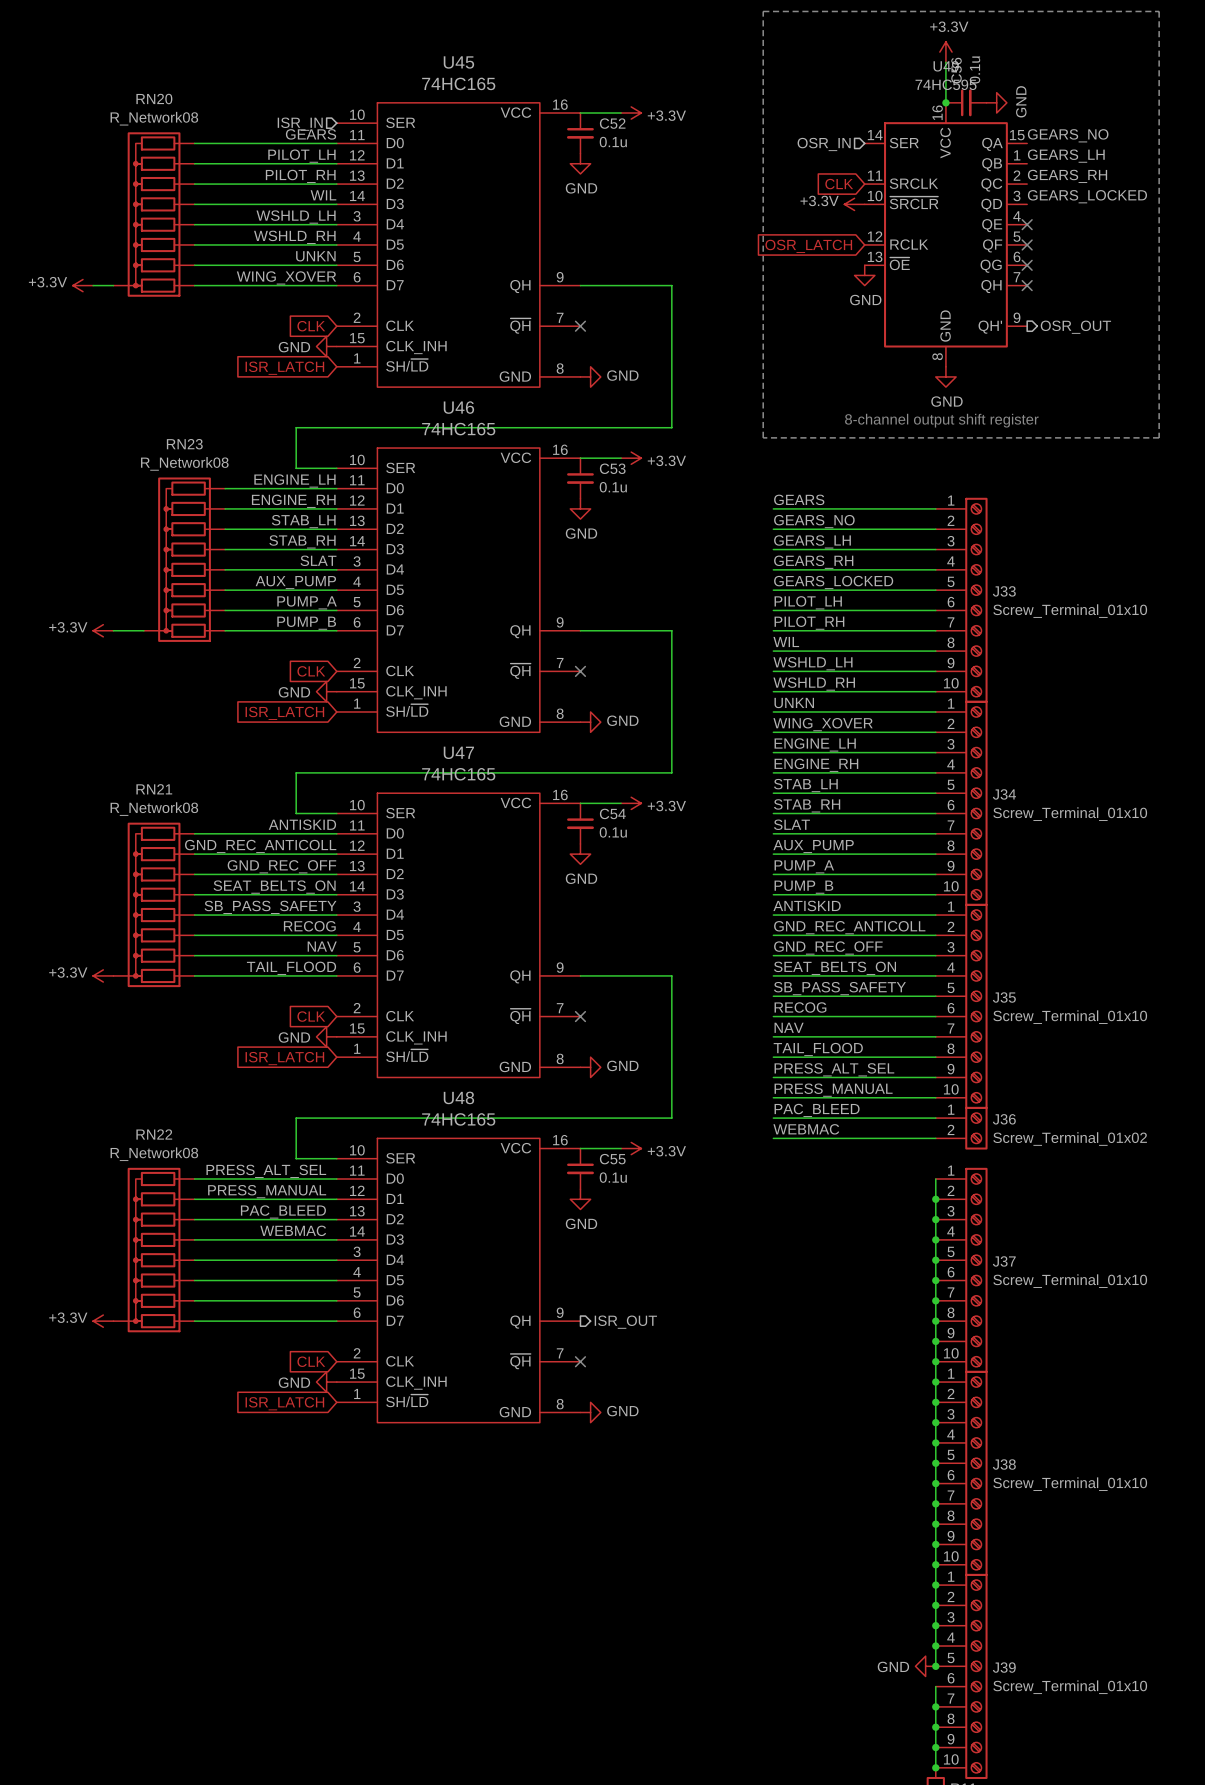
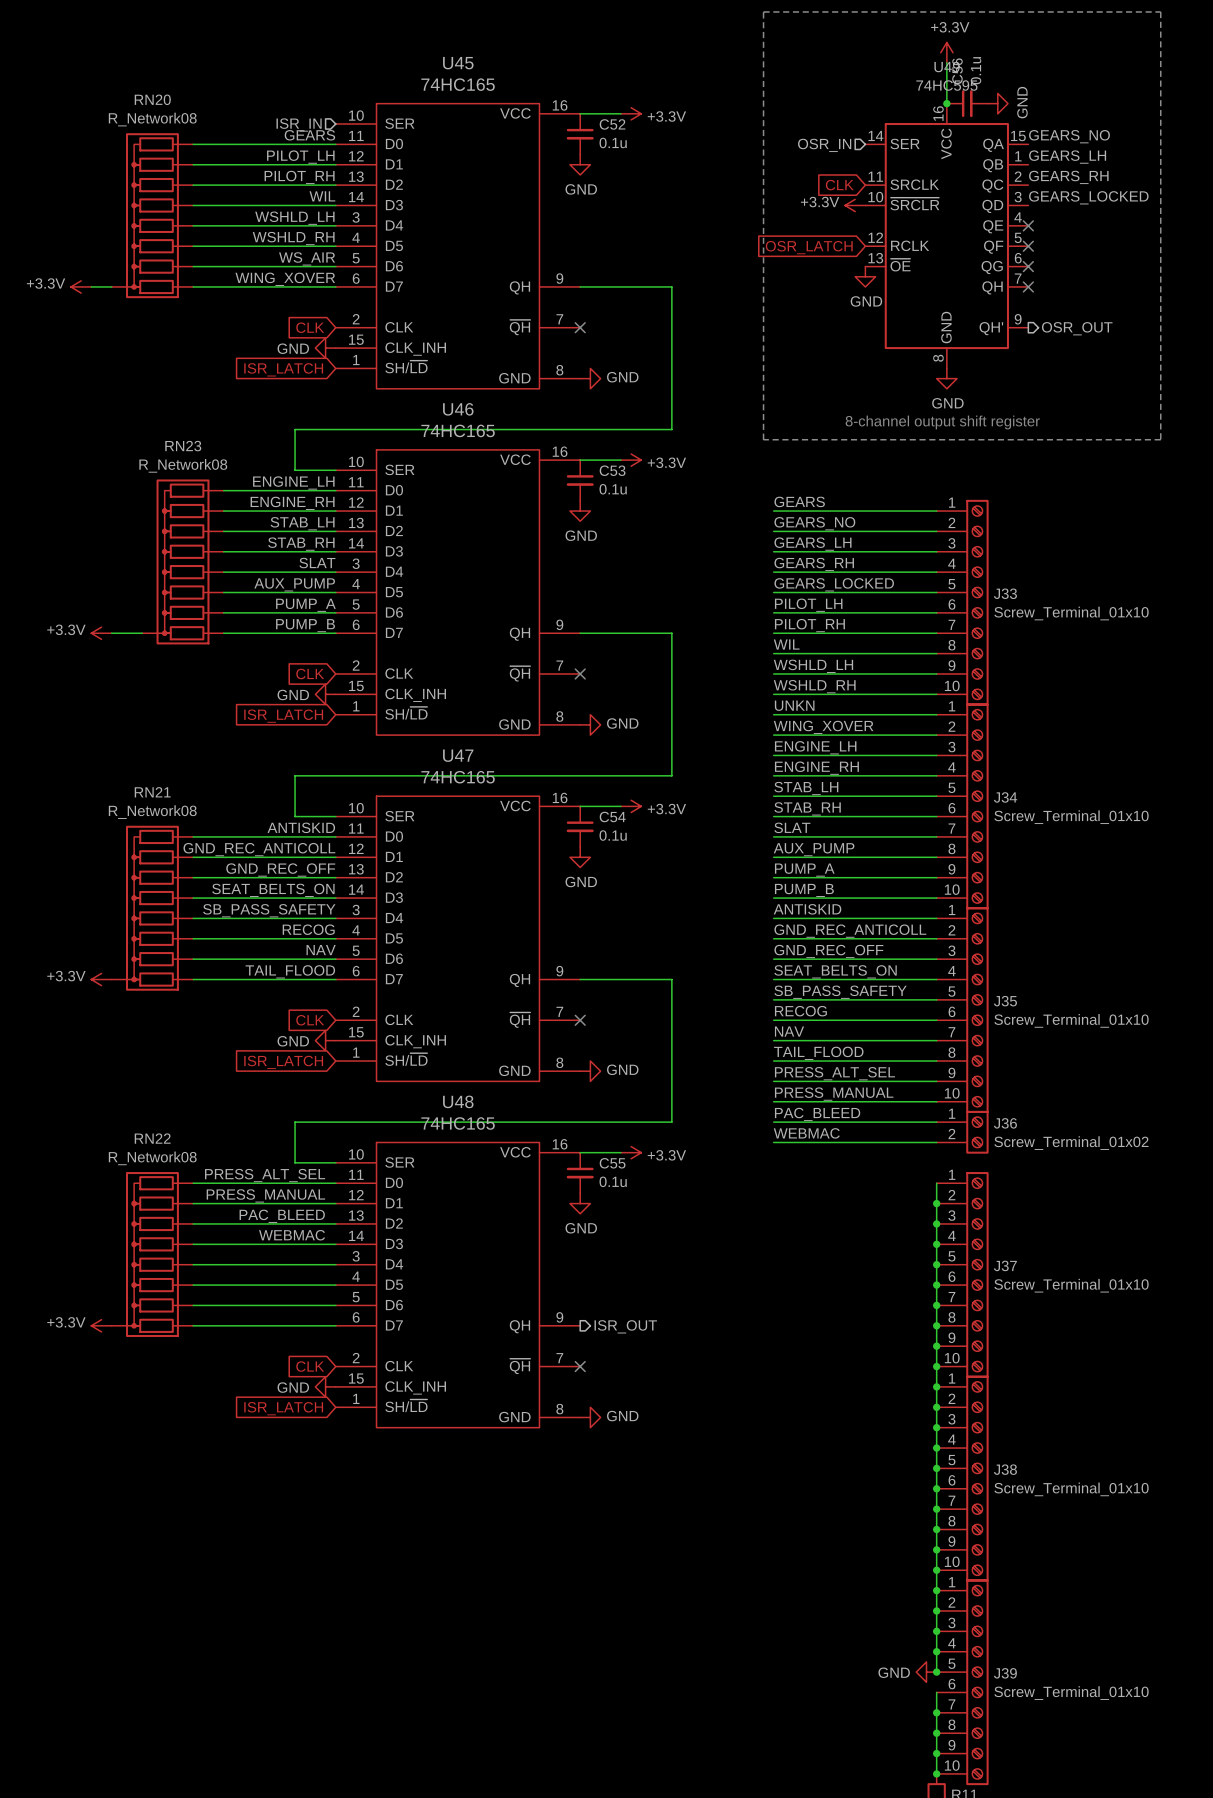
label: UNKN (315, 256) -> WS_AIR (307, 258)

